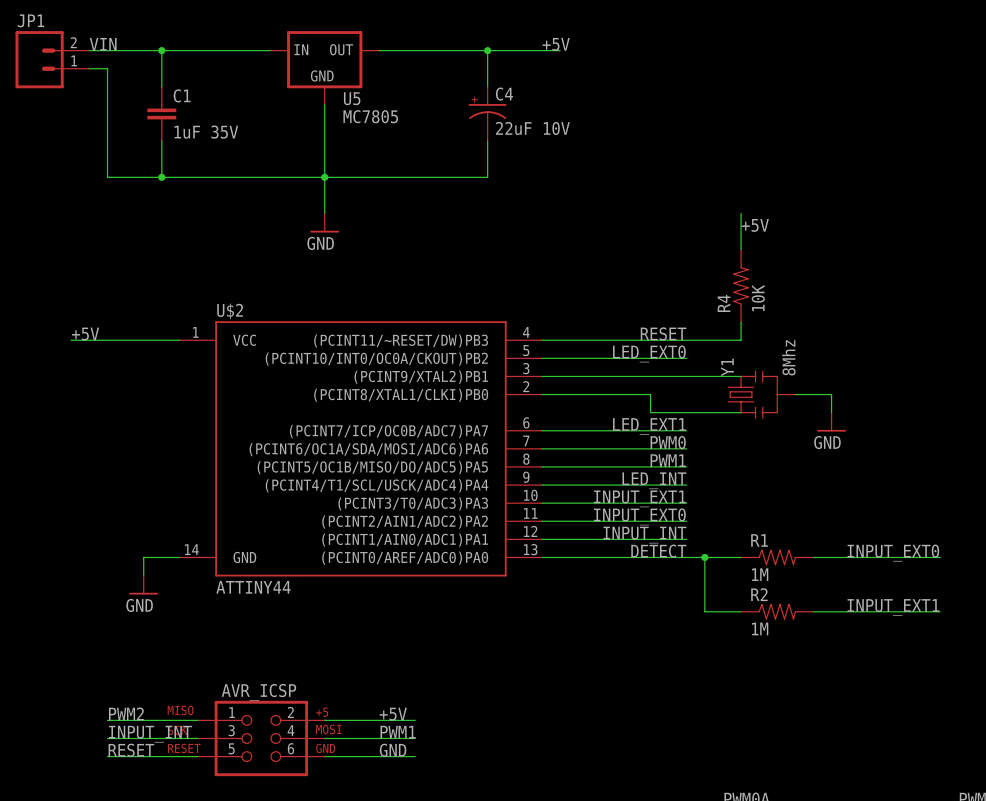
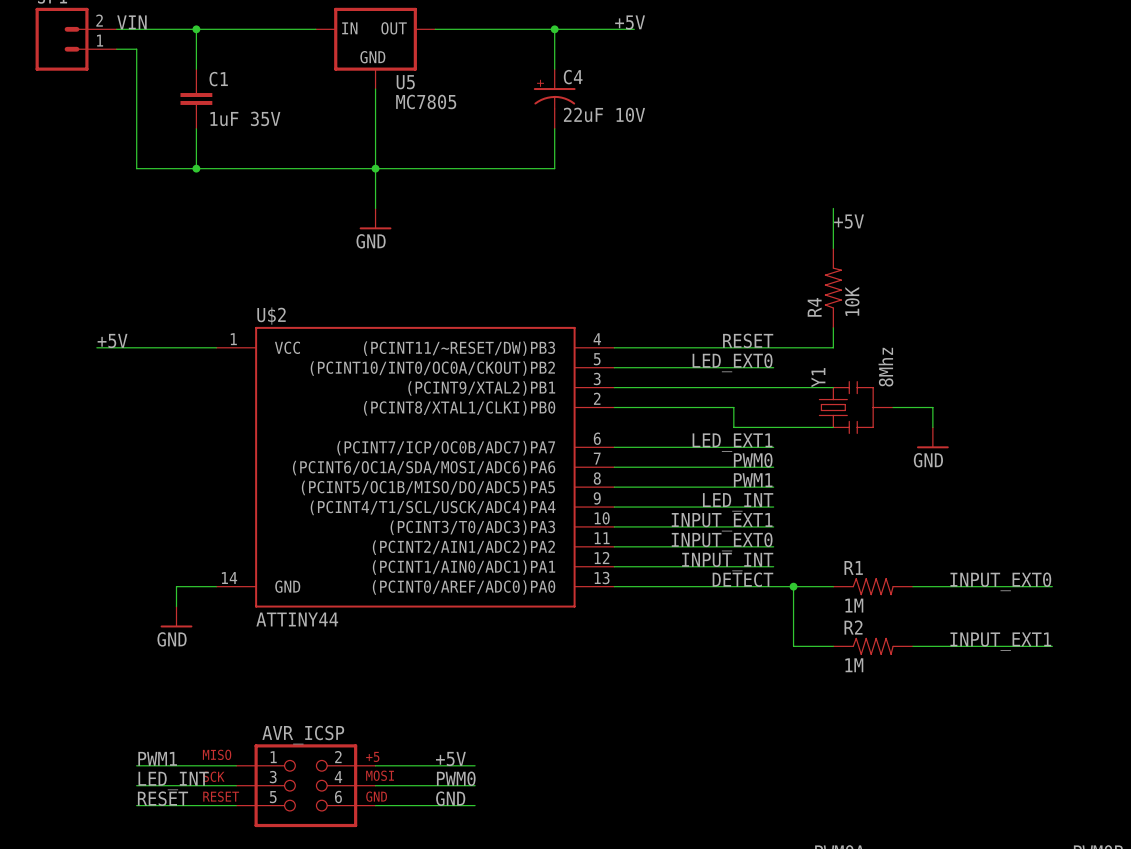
label: PWM2 (126, 713) -> PWM1 (157, 758)
label: PWM1 (398, 732) -> PWM0 (456, 778)
label: INPUT_INT (150, 734) -> LED_INT (173, 780)

